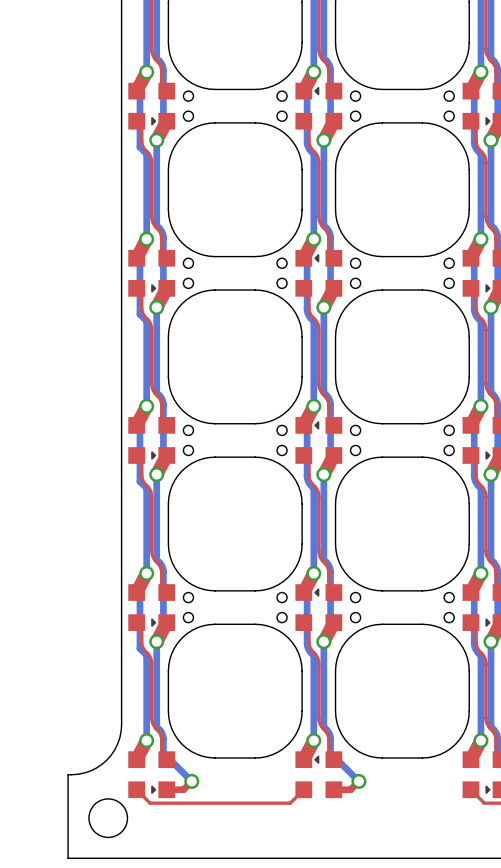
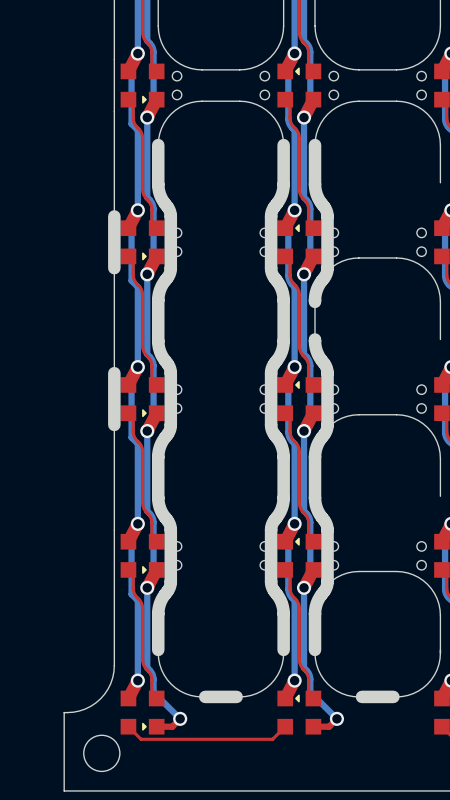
board edge width: thin (168, 169) (168, 209) -> thick (158, 145) (158, 182)
board edge width: thin (302, 169) (302, 209) -> thick (283, 145) (283, 182)
board edge width: thin (335, 169) (335, 209) -> thick (315, 145) (315, 182)
board edge: (168, 209) (171, 227) (182, 242) (197, 253) (215, 256) (261, 256) (278, 250) (288, 242) (295, 233) (300, 221) (302, 209) -> (158, 182) (160, 194) (169, 209) (170, 216) (170, 269) (160, 289) (158, 301)
board edge: (335, 209) (339, 227) (349, 242) (364, 253) (382, 256) (428, 256) (445, 250) (455, 242) (462, 233) (467, 221) (469, 209) -> (315, 182) (316, 194) (325, 209) (327, 216) (327, 269) (316, 289) (315, 301)
board edge width: thin (121, 245) (121, 300) -> thick (114, 216) (114, 268)
board edge: (168, 336) (171, 318) (182, 303) (197, 293) (215, 290) (261, 290) (278, 296) (288, 303) (295, 313) (300, 324) (302, 336) -> (283, 182) (281, 194) (272, 209) (271, 216) (271, 269) (281, 289) (283, 301)
board edge width: thin (168, 336) (168, 376) -> thick (158, 301) (158, 339)
board edge width: thin (302, 336) (302, 376) -> thick (283, 301) (283, 339)
board edge: (168, 376) (171, 394) (182, 410) (197, 420) (215, 423) (261, 423) (278, 417) (288, 410) (295, 400) (300, 389) (302, 376) -> (158, 339) (160, 351) (169, 366) (170, 373) (170, 426) (160, 446) (158, 458)
board edge: (335, 376) (339, 394) (349, 410) (364, 420) (382, 423) (428, 423) (445, 417) (455, 410) (462, 400) (467, 389) (469, 376) -> (315, 339) (316, 351) (325, 366) (327, 373) (327, 426) (316, 446) (315, 458)
board edge width: thin (121, 412) (121, 468) -> thick (114, 373) (114, 424)
board edge: (168, 503) (171, 486) (182, 470) (197, 460) (215, 457) (261, 457) (278, 463) (288, 470) (295, 480) (300, 491) (302, 503) -> (283, 339) (281, 351) (272, 366) (271, 373) (271, 426) (281, 446) (283, 458)
board edge width: thin (168, 503) (168, 544) -> thick (158, 458) (158, 496)
board edge width: thin (302, 503) (302, 544) -> thick (283, 458) (283, 496)
board edge width: thin (335, 503) (335, 544) -> thick (315, 458) (315, 496)
board edge: (168, 544) (171, 561) (182, 577) (197, 587) (215, 590) (261, 590) (278, 584) (288, 577) (295, 567) (300, 556) (302, 544) -> (158, 496) (160, 508) (169, 523) (170, 529) (170, 583) (160, 603) (158, 615)
board edge: (335, 544) (339, 561) (349, 577) (364, 587) (382, 590) (428, 590) (445, 584) (455, 577) (462, 567) (467, 556) (469, 544) -> (315, 496) (316, 508) (325, 523) (327, 529) (327, 583) (316, 603) (315, 615)
board edge: (168, 671) (171, 653) (182, 638) (197, 627) (215, 624) (261, 624) (278, 630) (288, 638) (295, 647) (300, 658) (302, 671) -> (283, 496) (281, 508) (272, 523) (271, 529) (271, 583) (281, 603) (283, 615)
board edge width: thin (168, 671) (168, 707) -> thick (158, 615) (158, 649)
board edge width: thin (302, 671) (302, 711) -> thick (283, 615) (283, 653)
board edge width: thin (335, 671) (335, 707) -> thick (315, 615) (315, 649)
board edge width: thin (218, 758) (251, 758) -> thick (205, 696) (236, 696)
board edge width: thin (385, 758) (419, 758) -> thick (362, 696) (393, 696)

